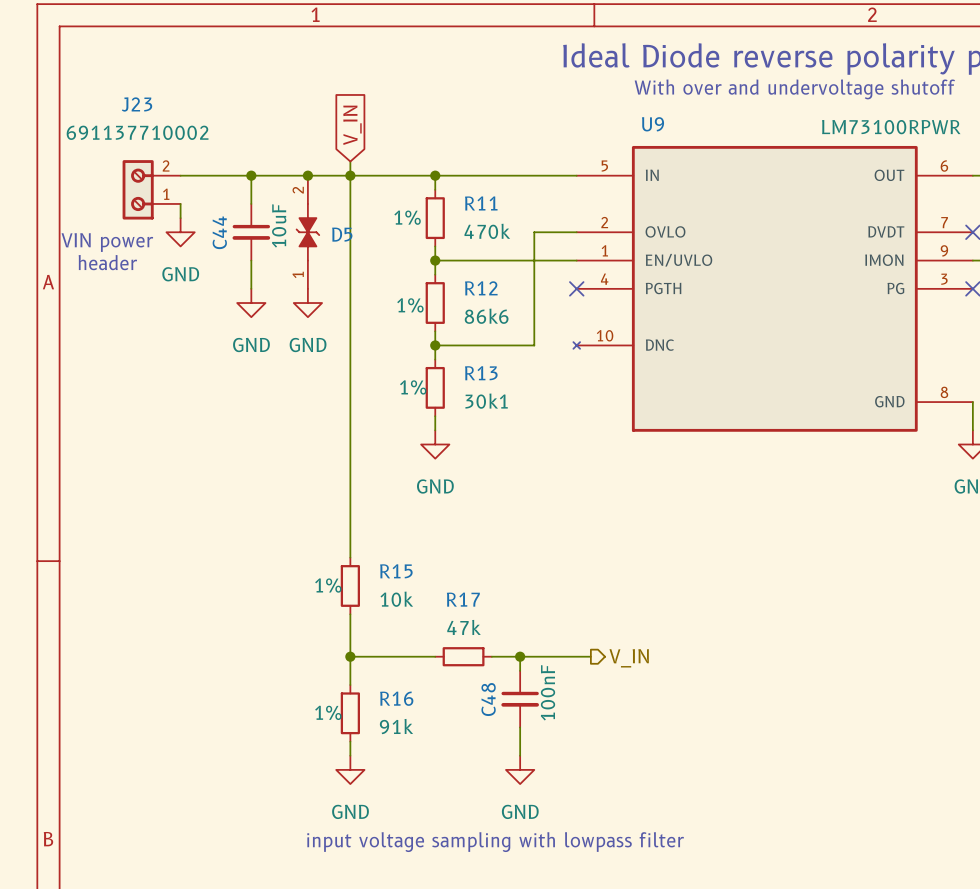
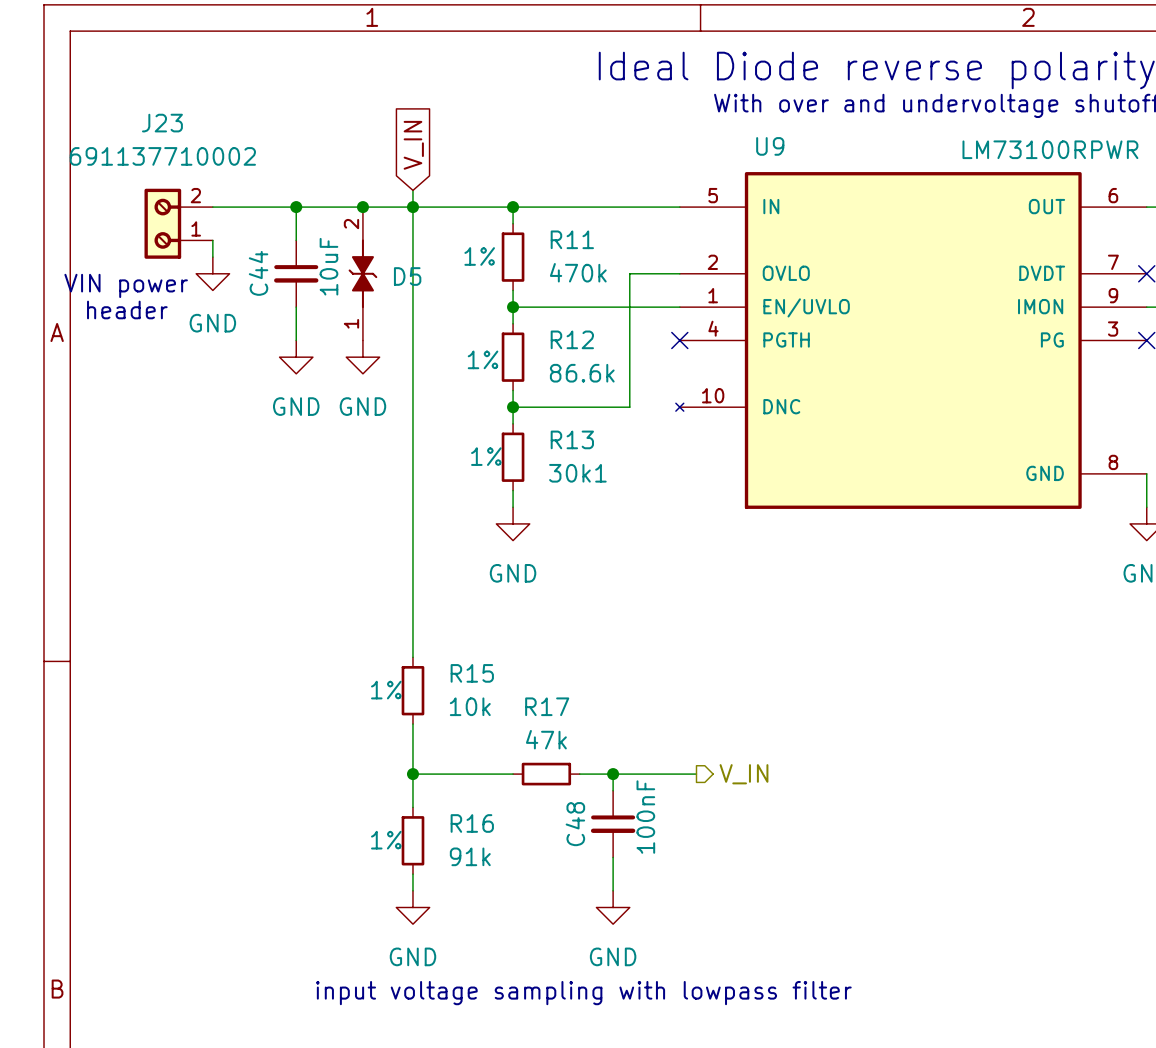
R12 value: 86k6 (486, 316) -> 86.6k (582, 373)

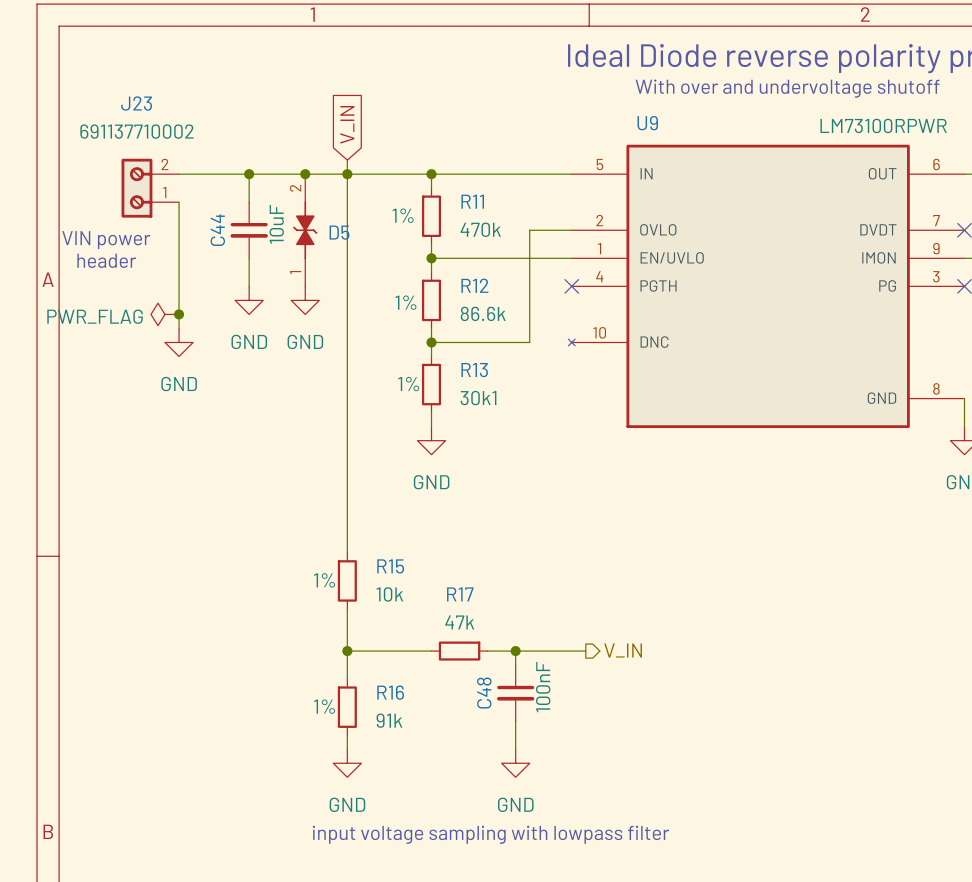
wire: none -> (179, 216) (179, 328)
power symbol position: GND (212, 273) -> GND (179, 342)
power symbol: none -> PWR_FLAG (165, 314)
junction: none -> (179, 314)

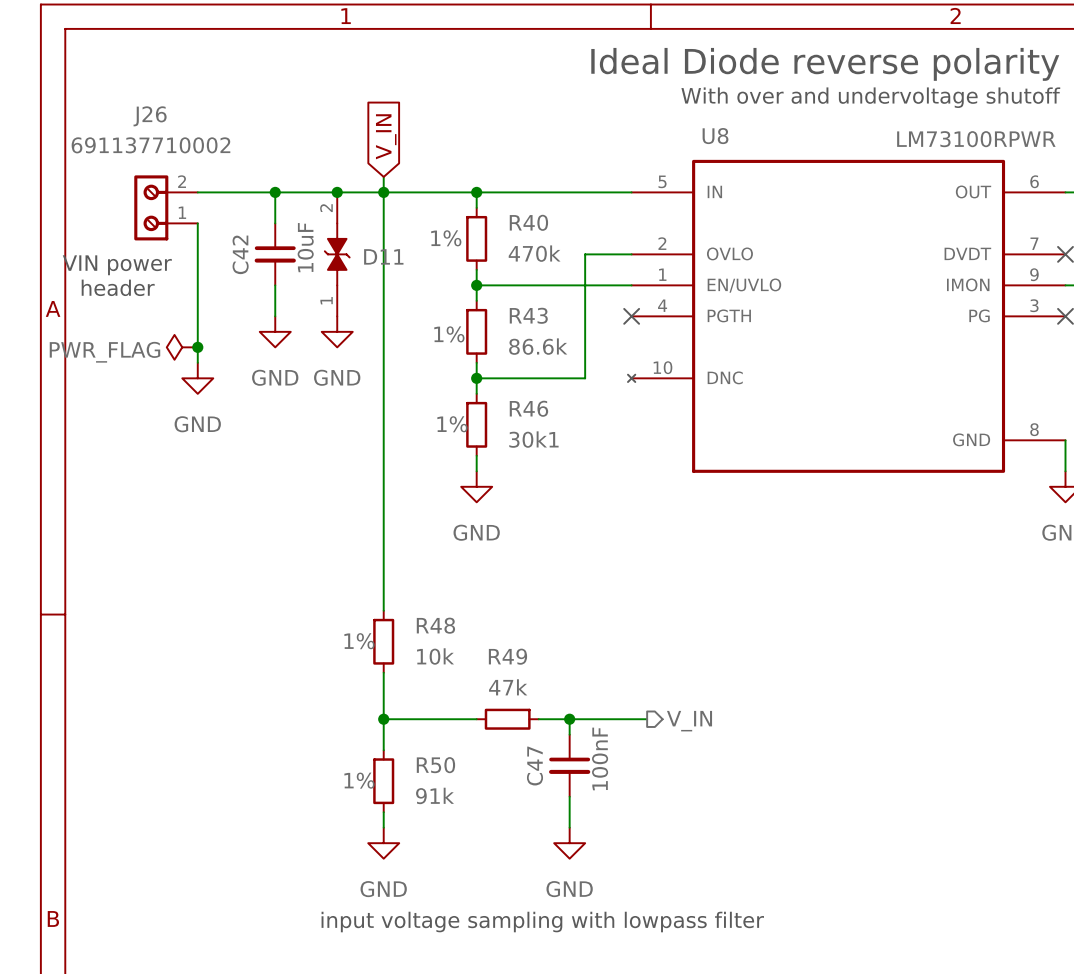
J23 name: J23 (136, 103) -> J26 (150, 116)
U9 name: U9 (647, 123) -> U8 (715, 136)
R11 name: R11 (472, 201) -> R40 (528, 222)
C44 name: C44 (217, 230) -> C42 (240, 254)
D5 name: D5 (339, 232) -> D11 (383, 256)
R12 name: R12 (474, 285) -> R43 (528, 315)
R13 name: R13 (474, 370) -> R46 (528, 408)
R15 name: R15 (390, 566) -> R48 (435, 625)
R17 name: R17 (460, 594) -> R49 (507, 656)
R16 name: R16 (390, 692) -> R50 (435, 765)
C48 name: C48 (484, 693) -> C47 (535, 766)

